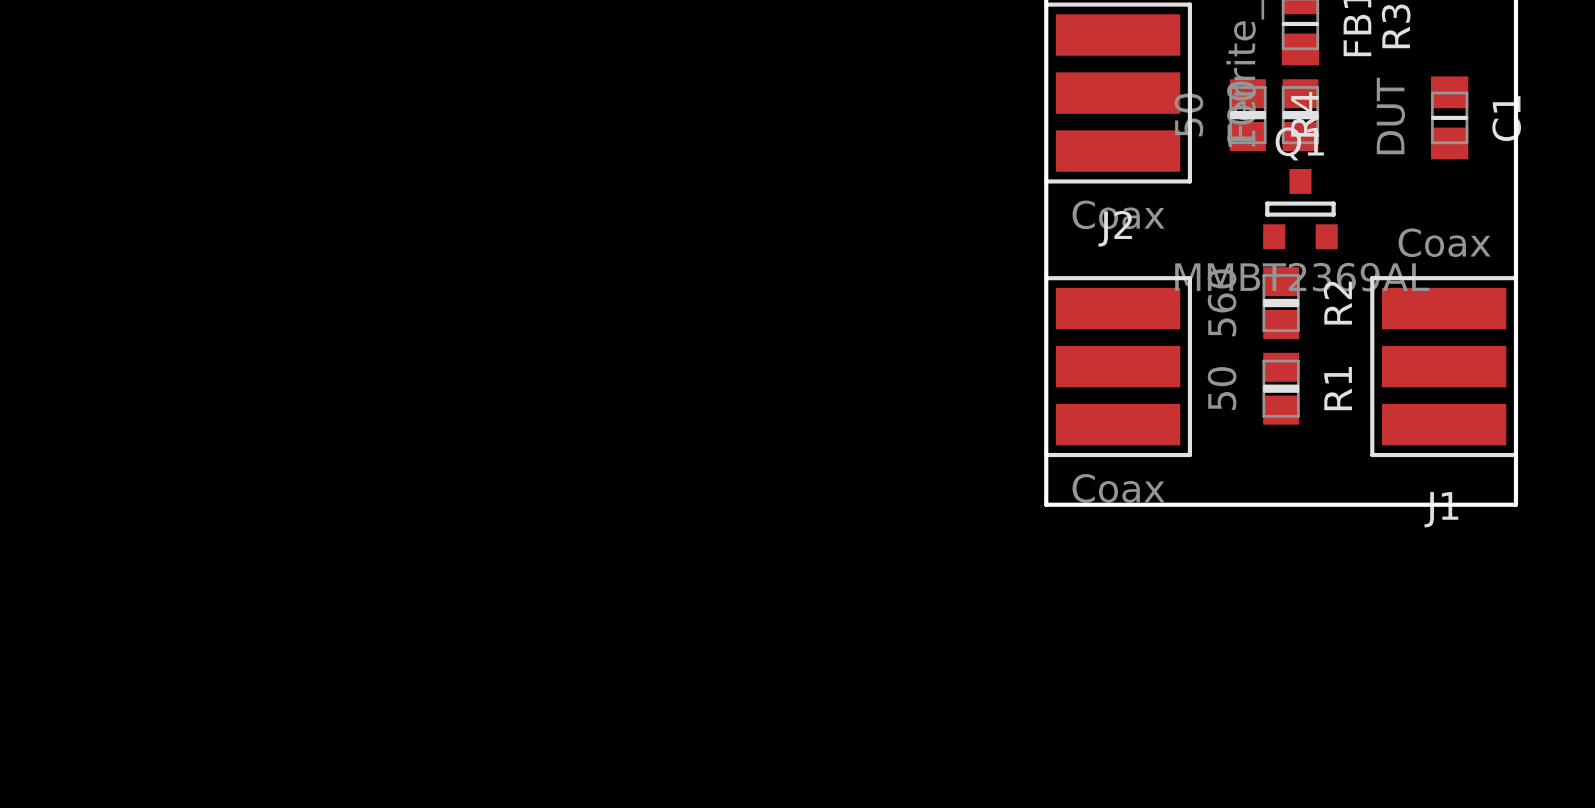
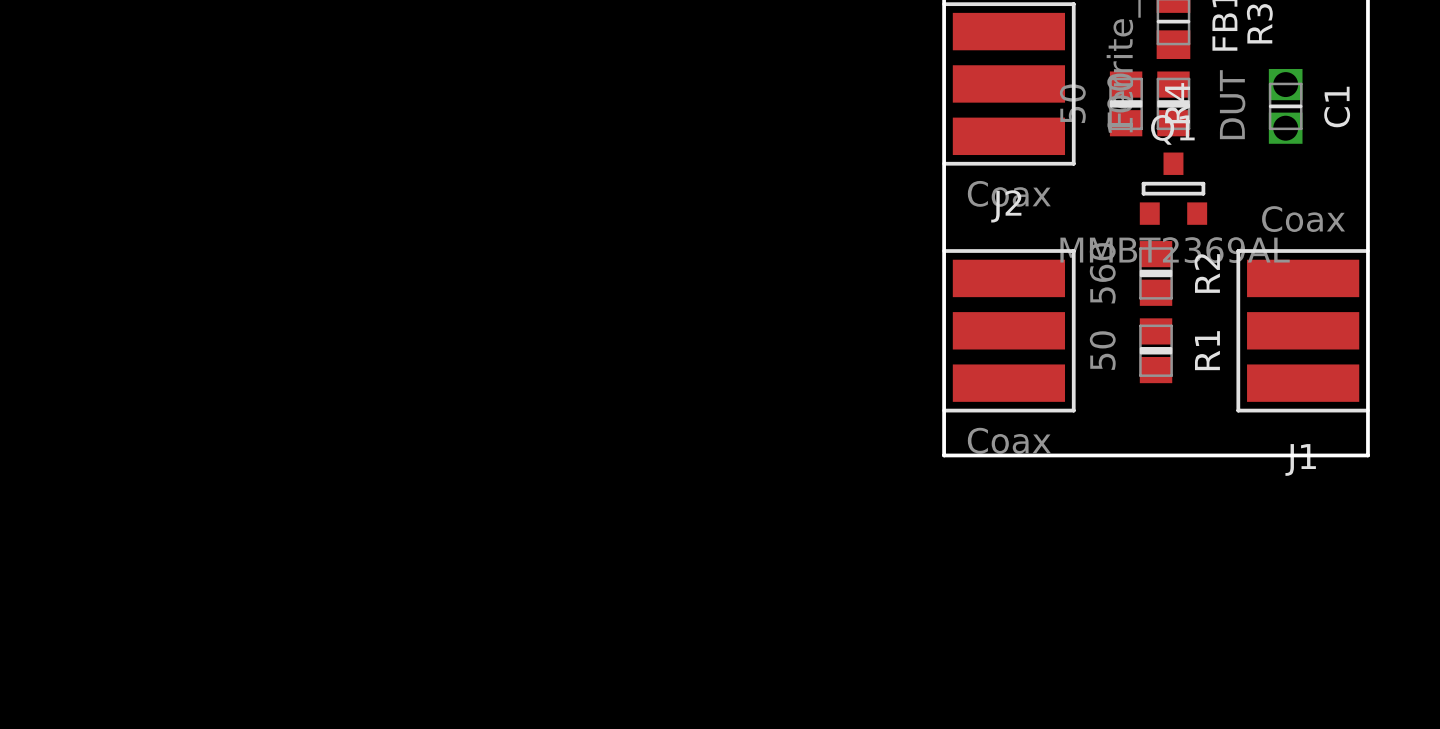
C1 footprint: [1431, 76, 1469, 160] -> [1268, 68, 1303, 144]

